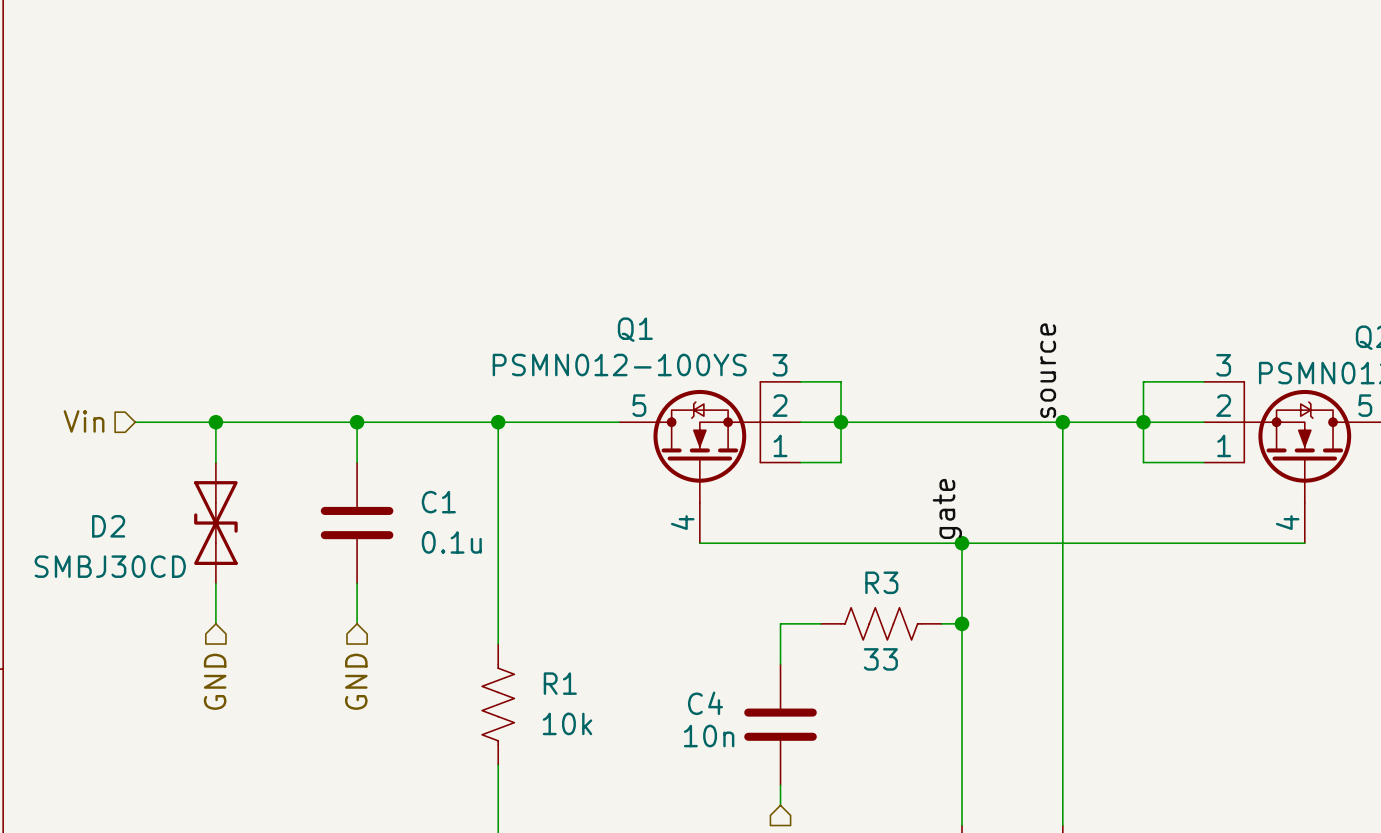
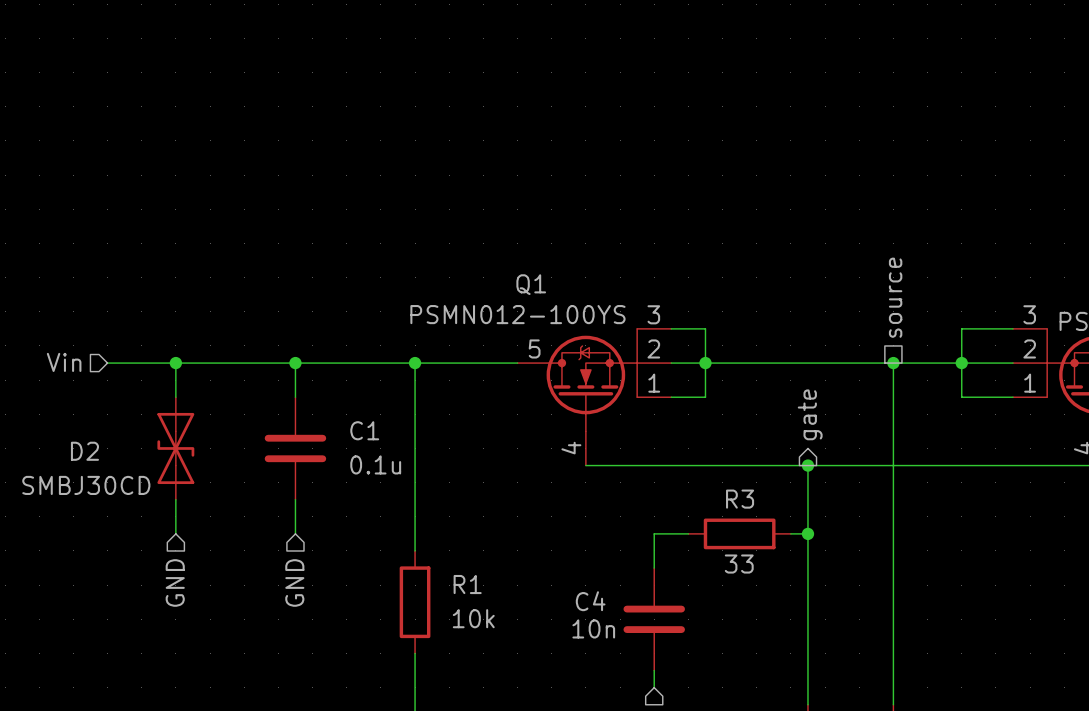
hierarchical label: none -> source (895, 297)
label: source (1048, 370) -> none
hierarchical label: none -> gate (810, 414)
label: gate (947, 508) -> none
R3 symbol: [820, 607, 942, 641] -> [688, 518, 791, 550]
R1 symbol: [482, 644, 515, 766] -> [399, 550, 431, 654]

